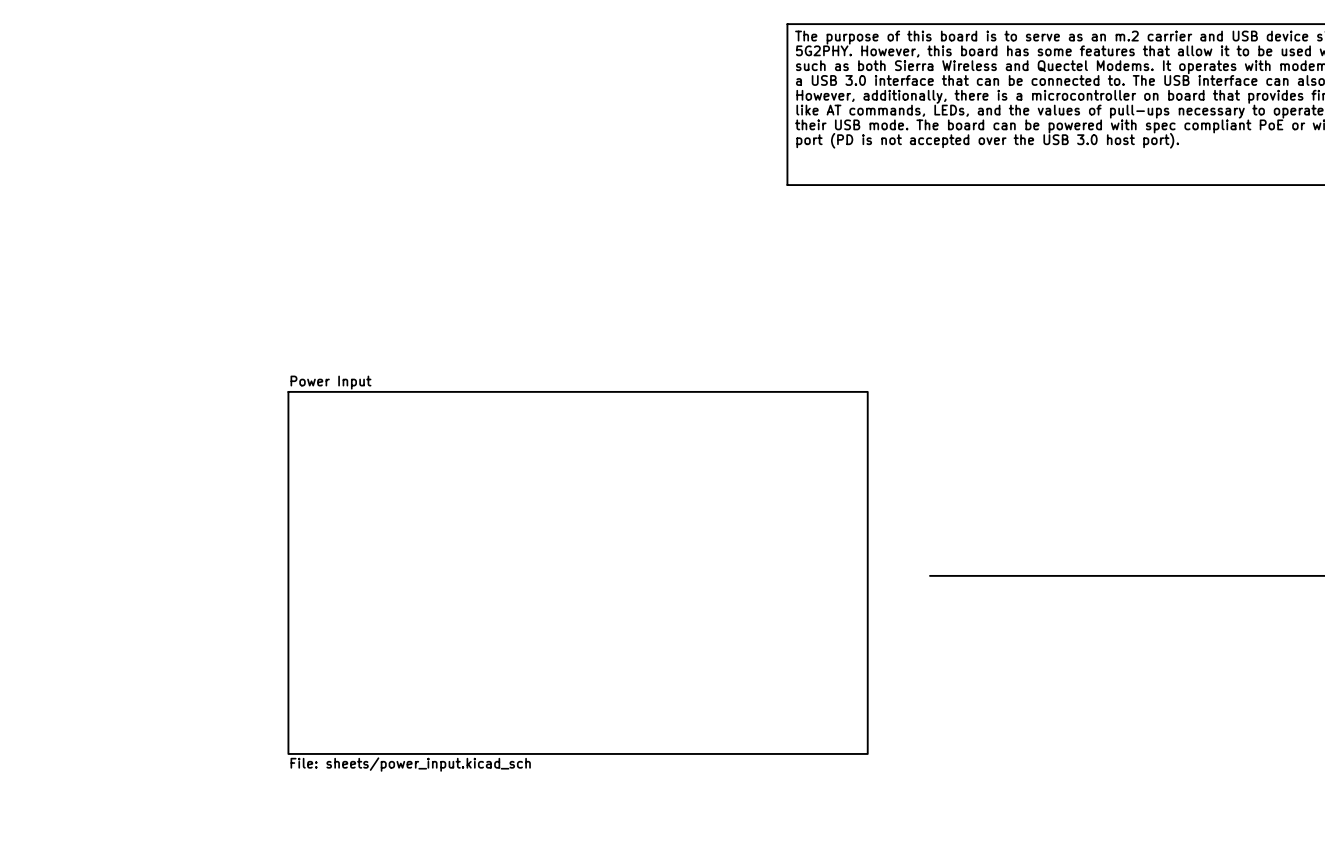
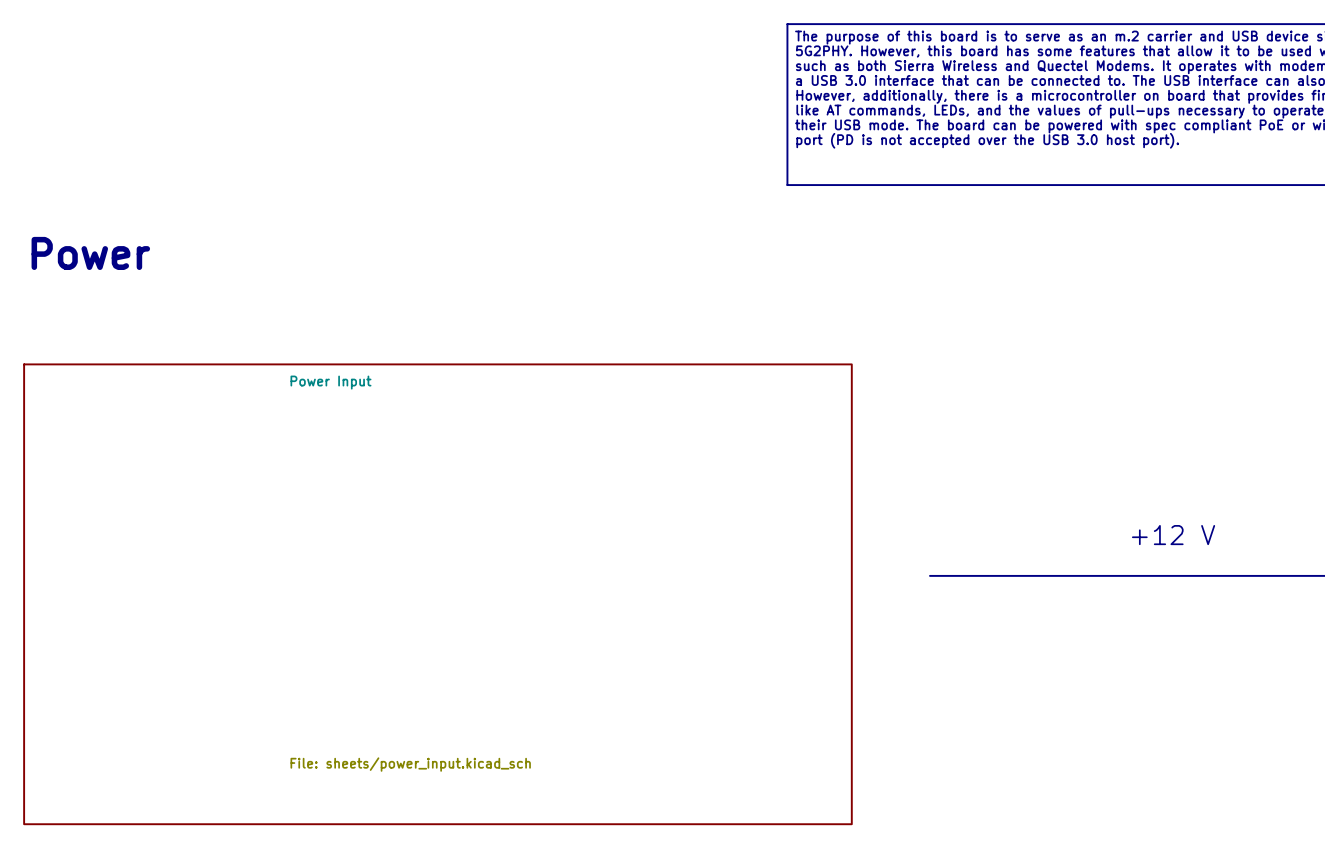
text: none -> Power (90, 253)
text: none -> +12 V (1173, 535)
sheet Power Input: File: sheets/power_input.kicad_sch (578, 572) -> none
sheet Power Input: none -> File: sheets/power_input.kicad_sch (437, 594)

